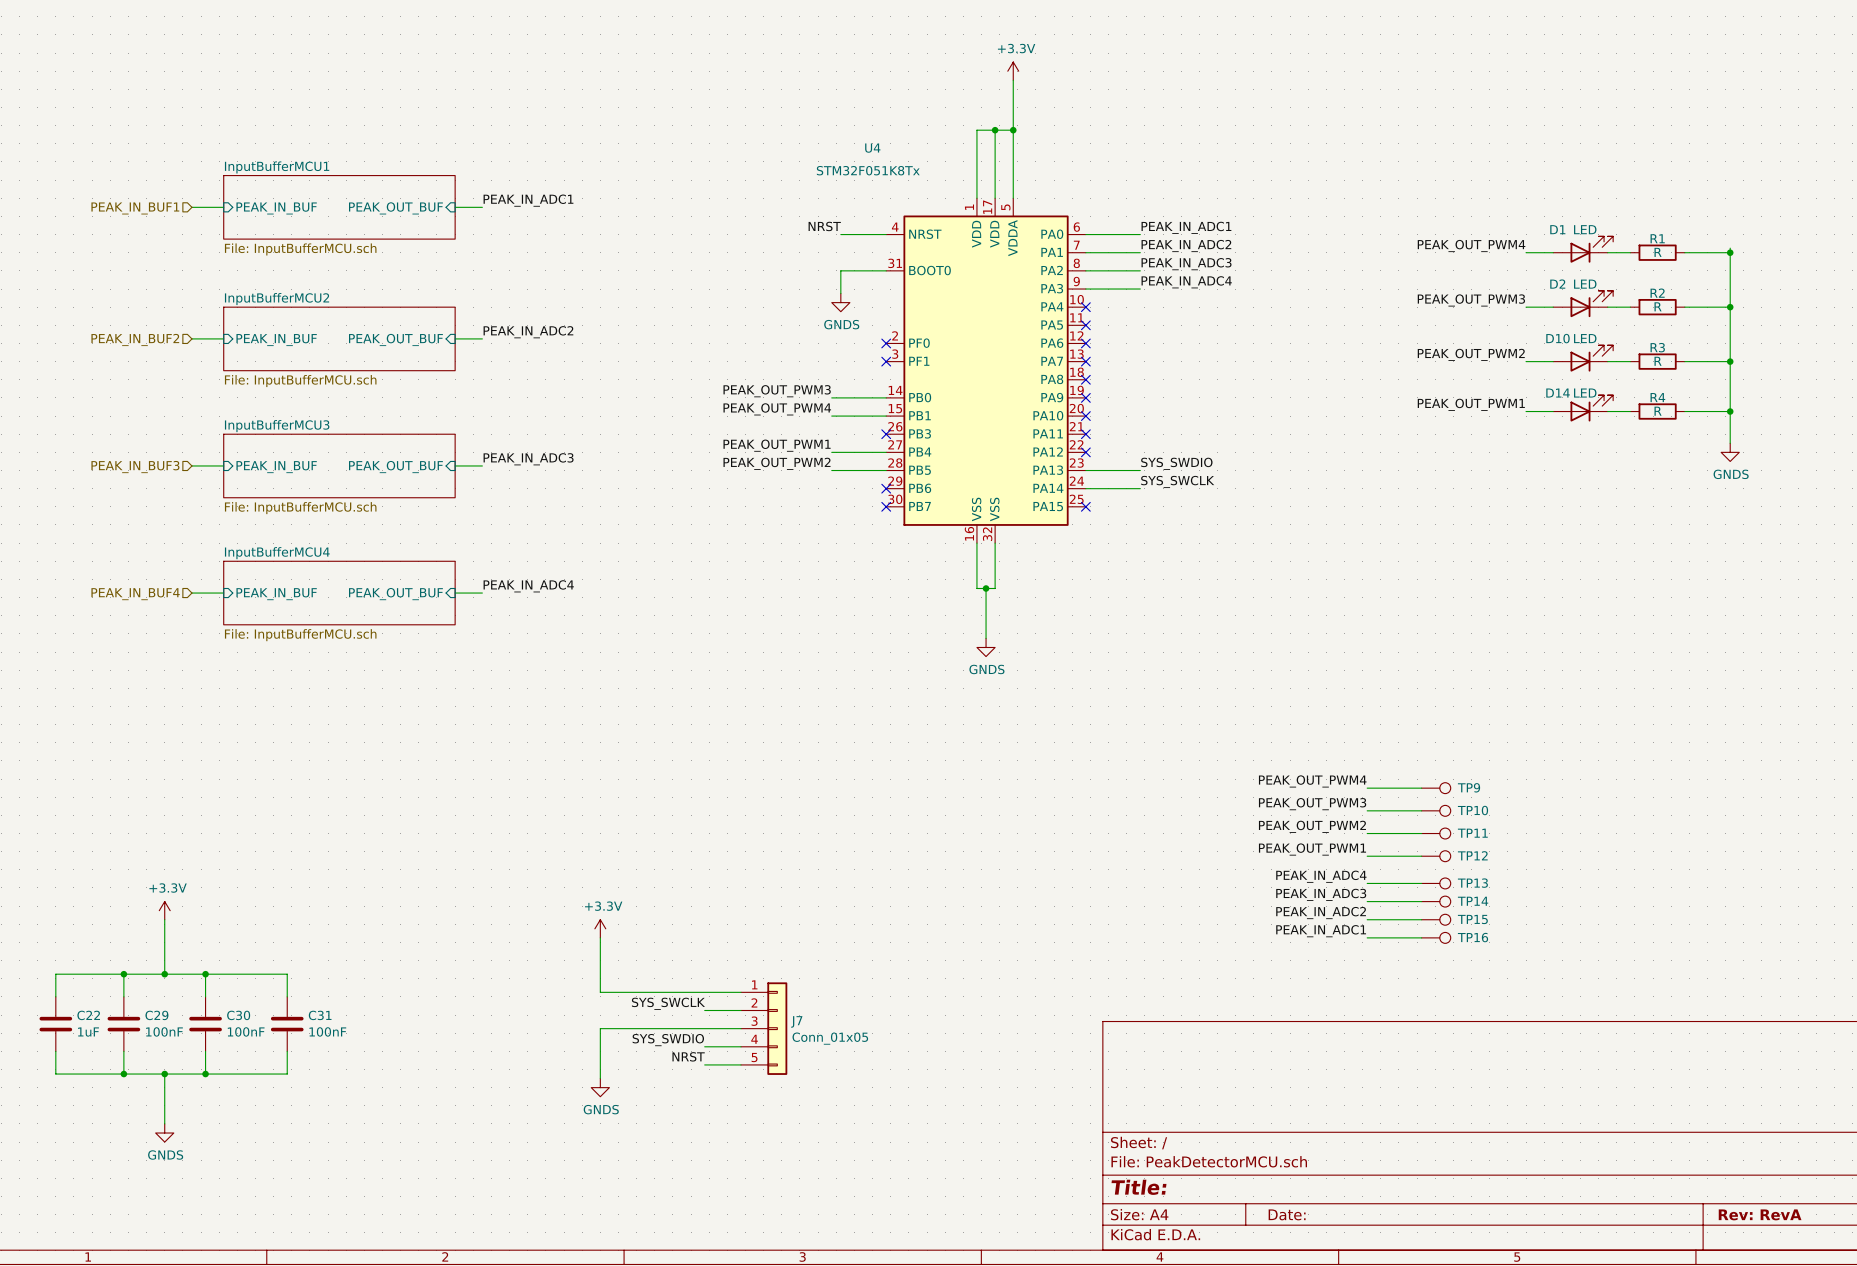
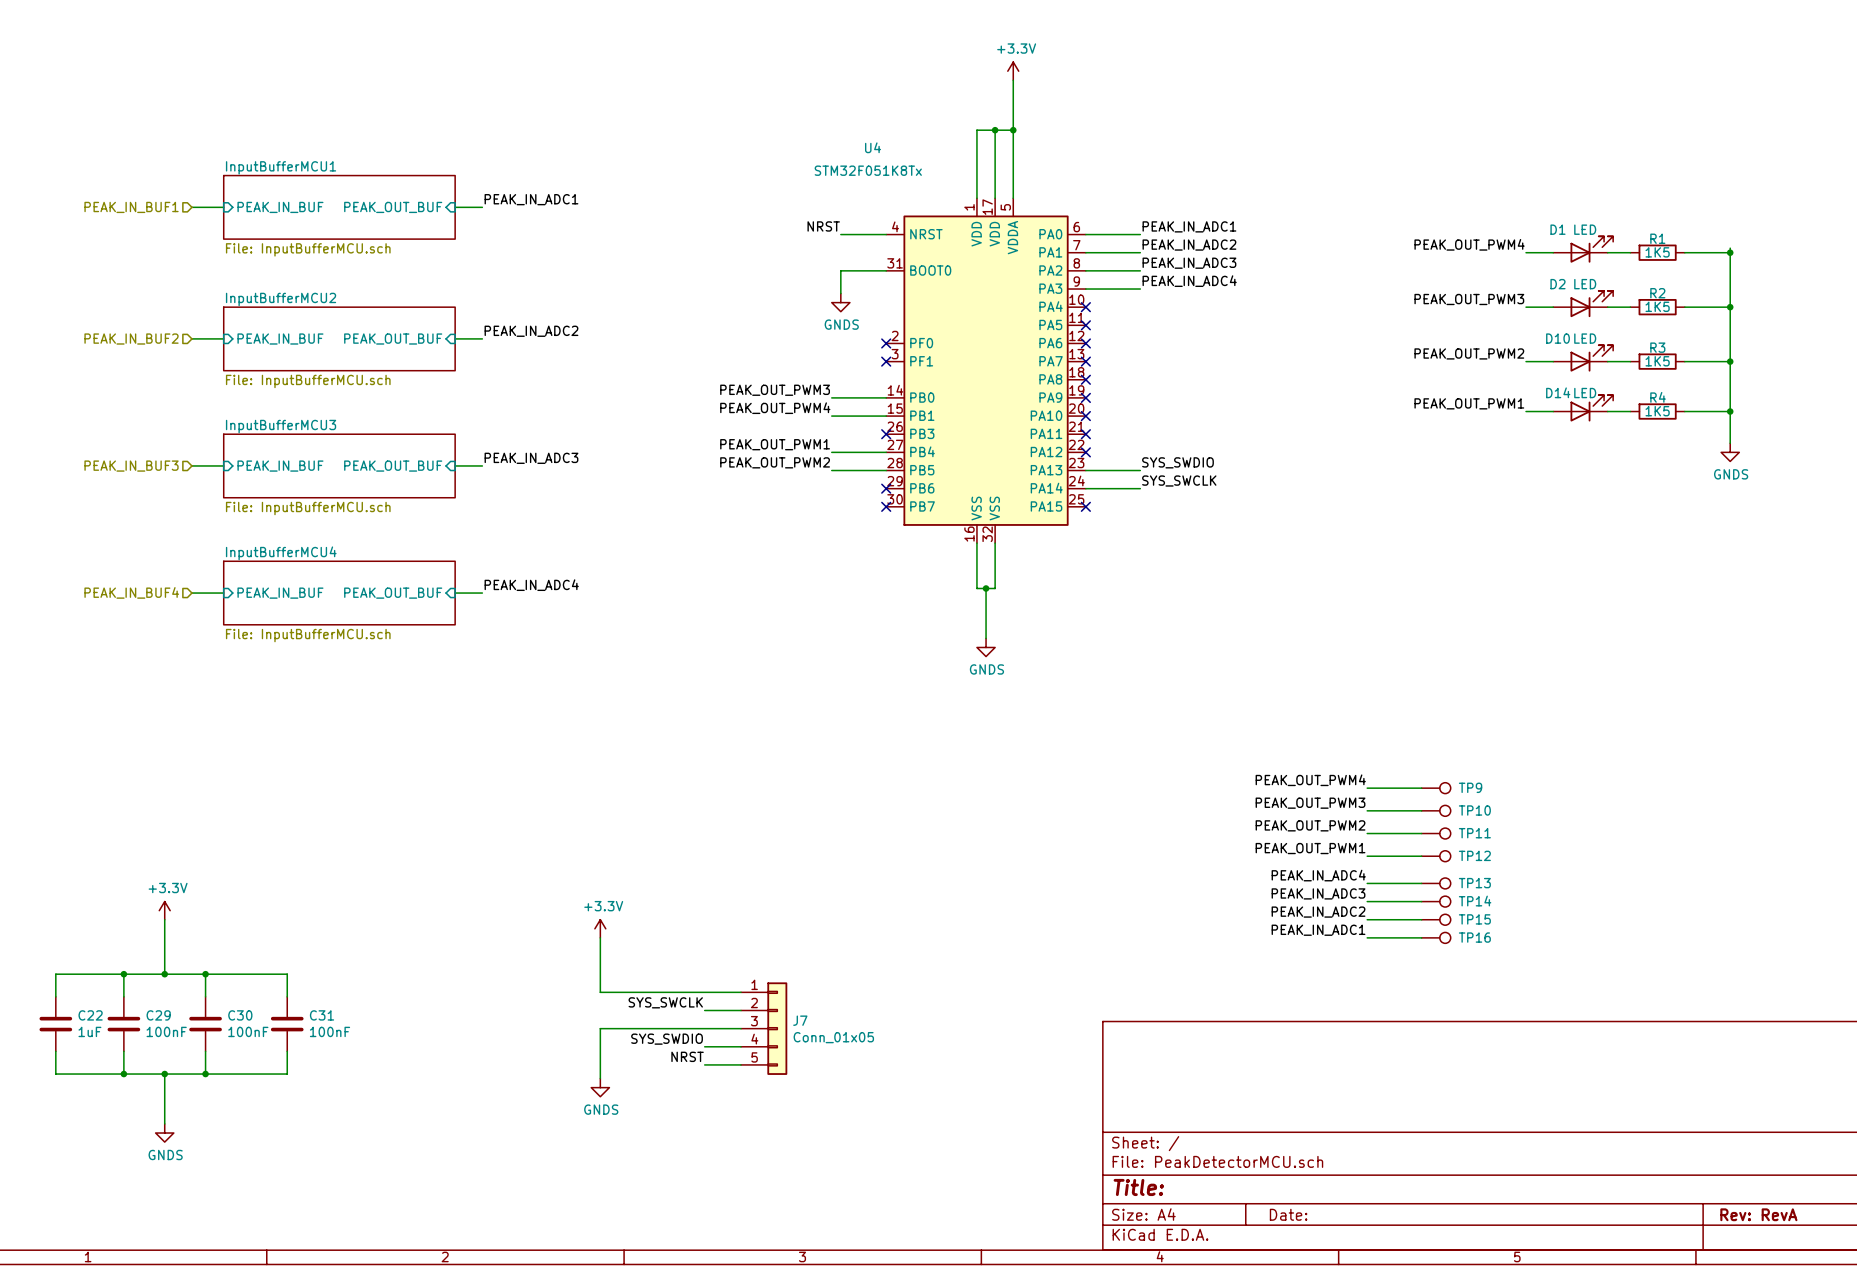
R1 value: R (1658, 252) -> 1K5 (1657, 252)
R2 value: R (1658, 306) -> 1K5 (1657, 306)
R3 value: R (1658, 361) -> 1K5 (1657, 361)
R4 value: R (1658, 411) -> 1K5 (1657, 411)

